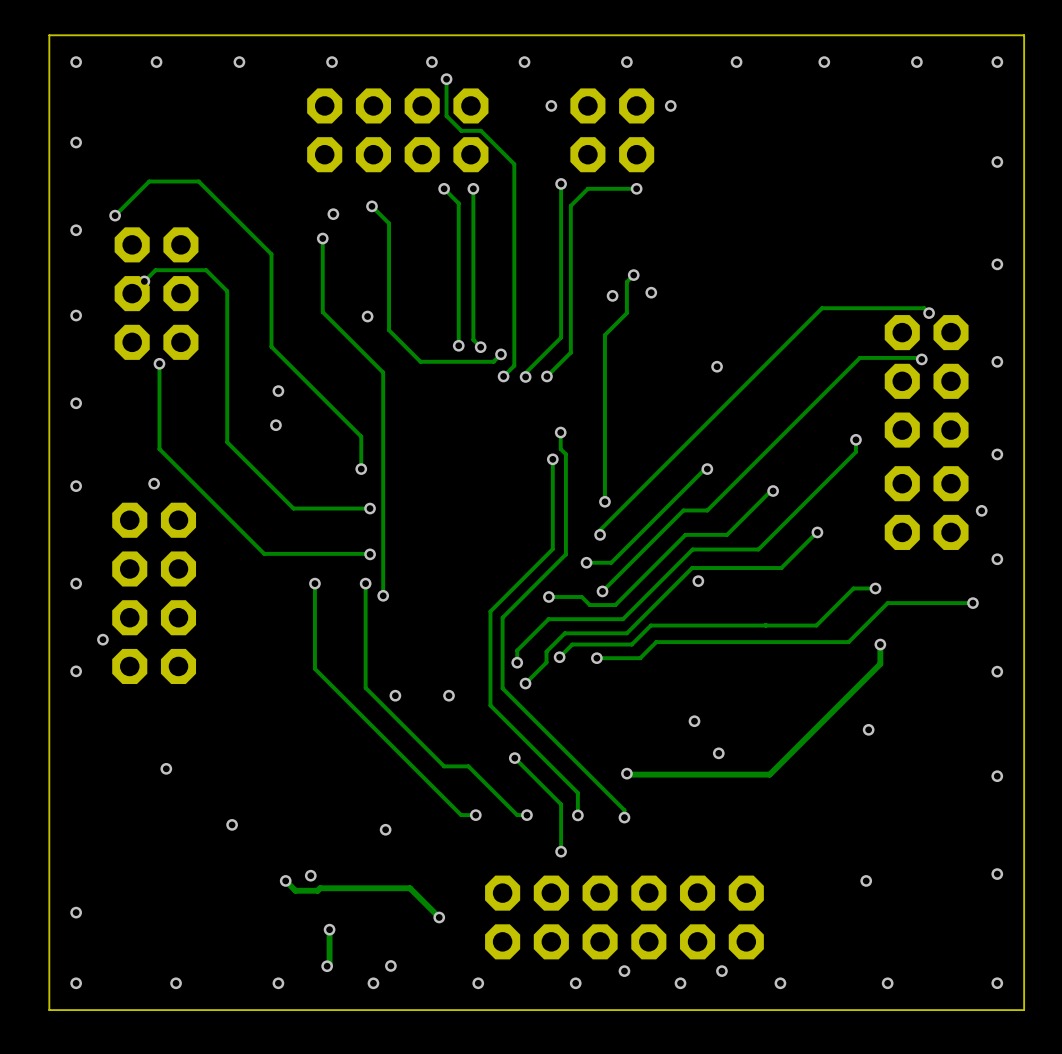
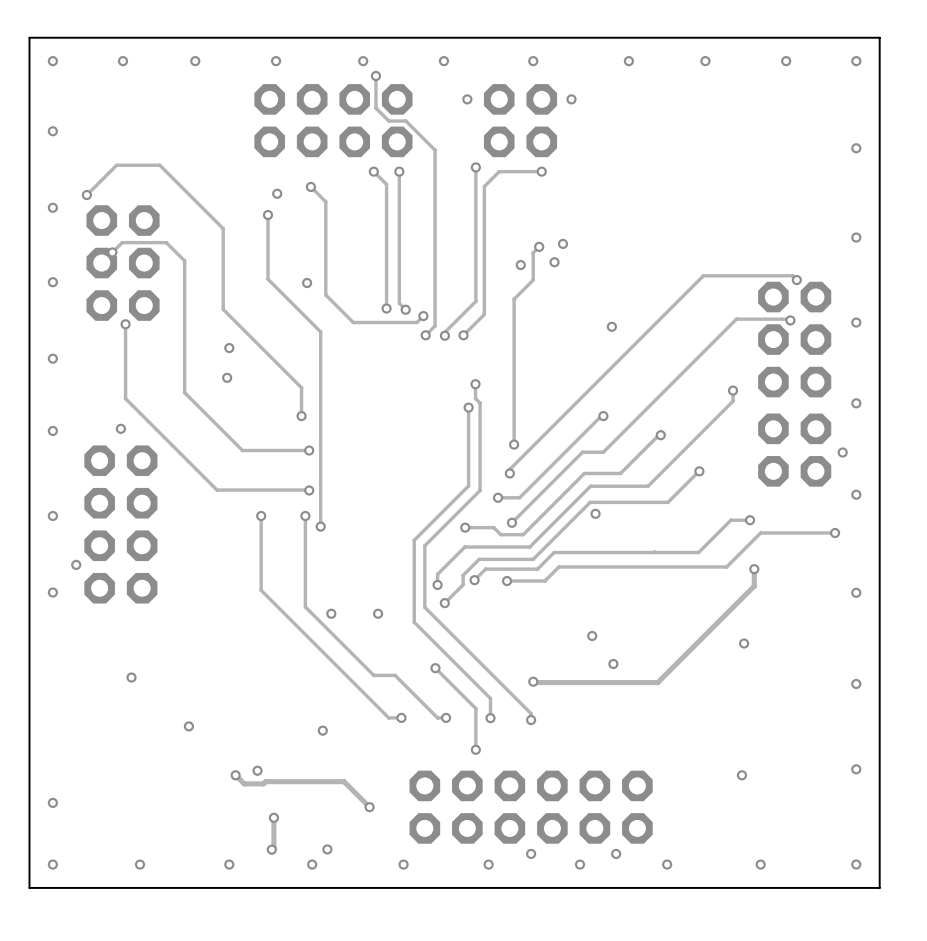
via: none -> (563, 243)

